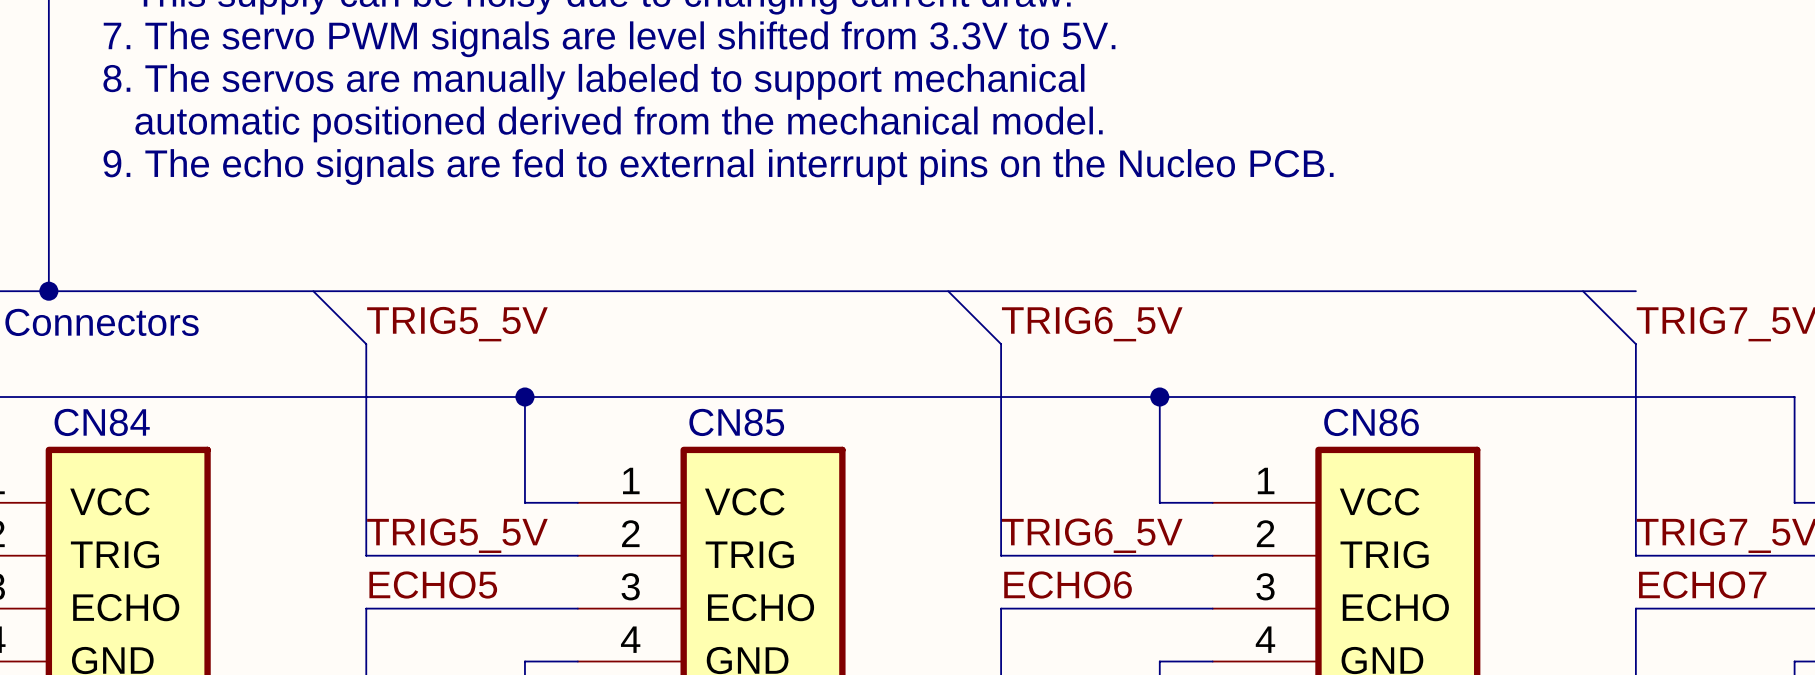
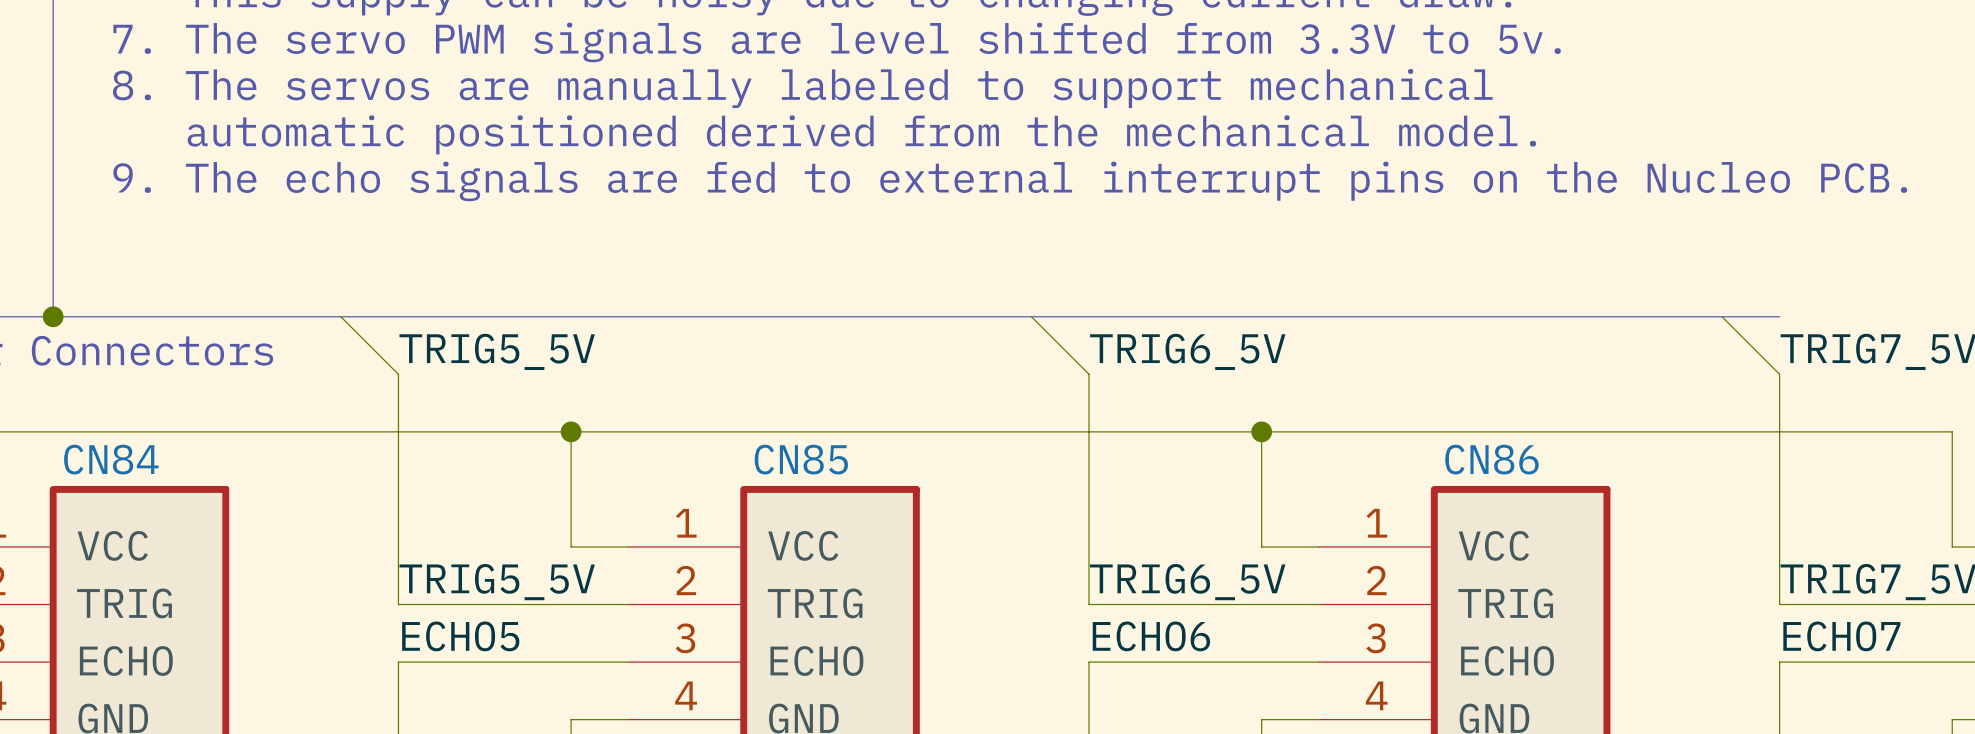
text: 7. The servo PWM signals are level shifted from 3.3V to 5V. (609, 39) -> 7. The servo PWM signals are level shifted from 3.3V to 5v. (837, 42)

